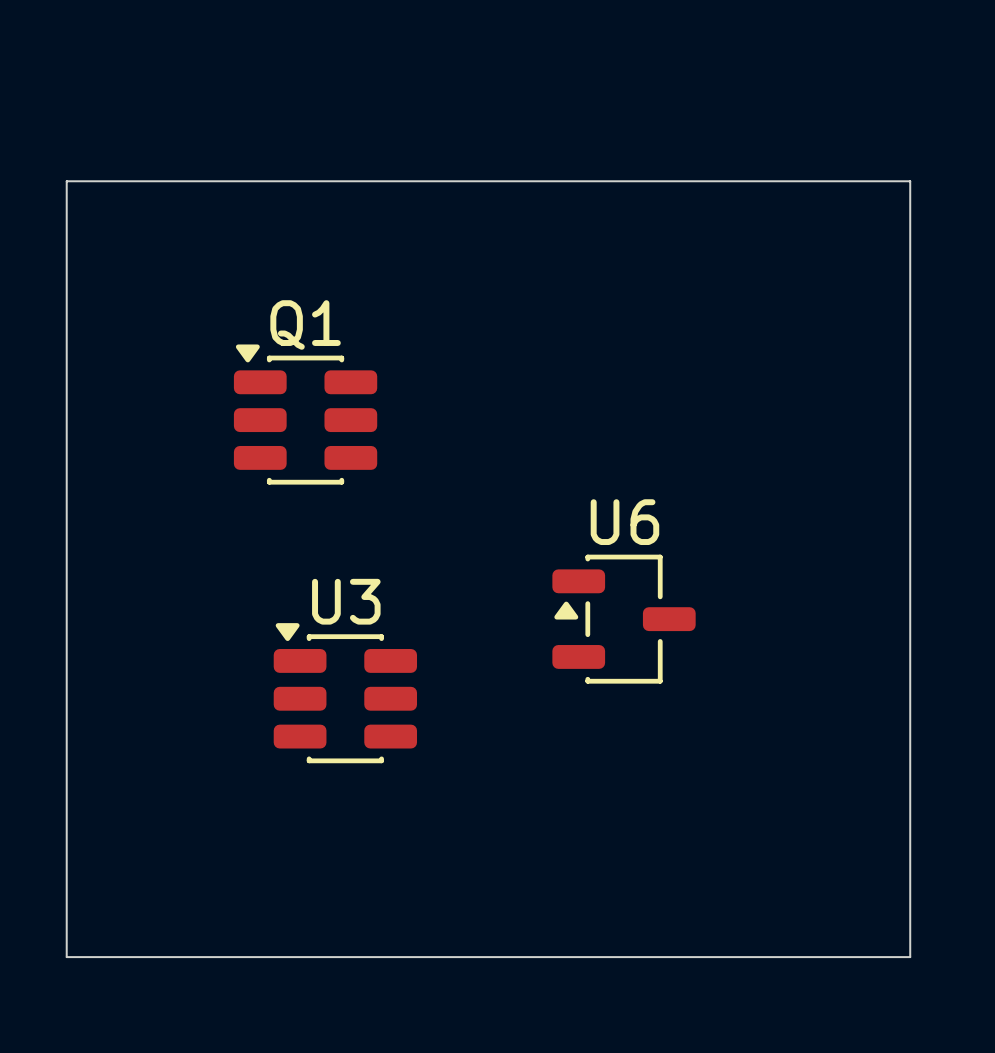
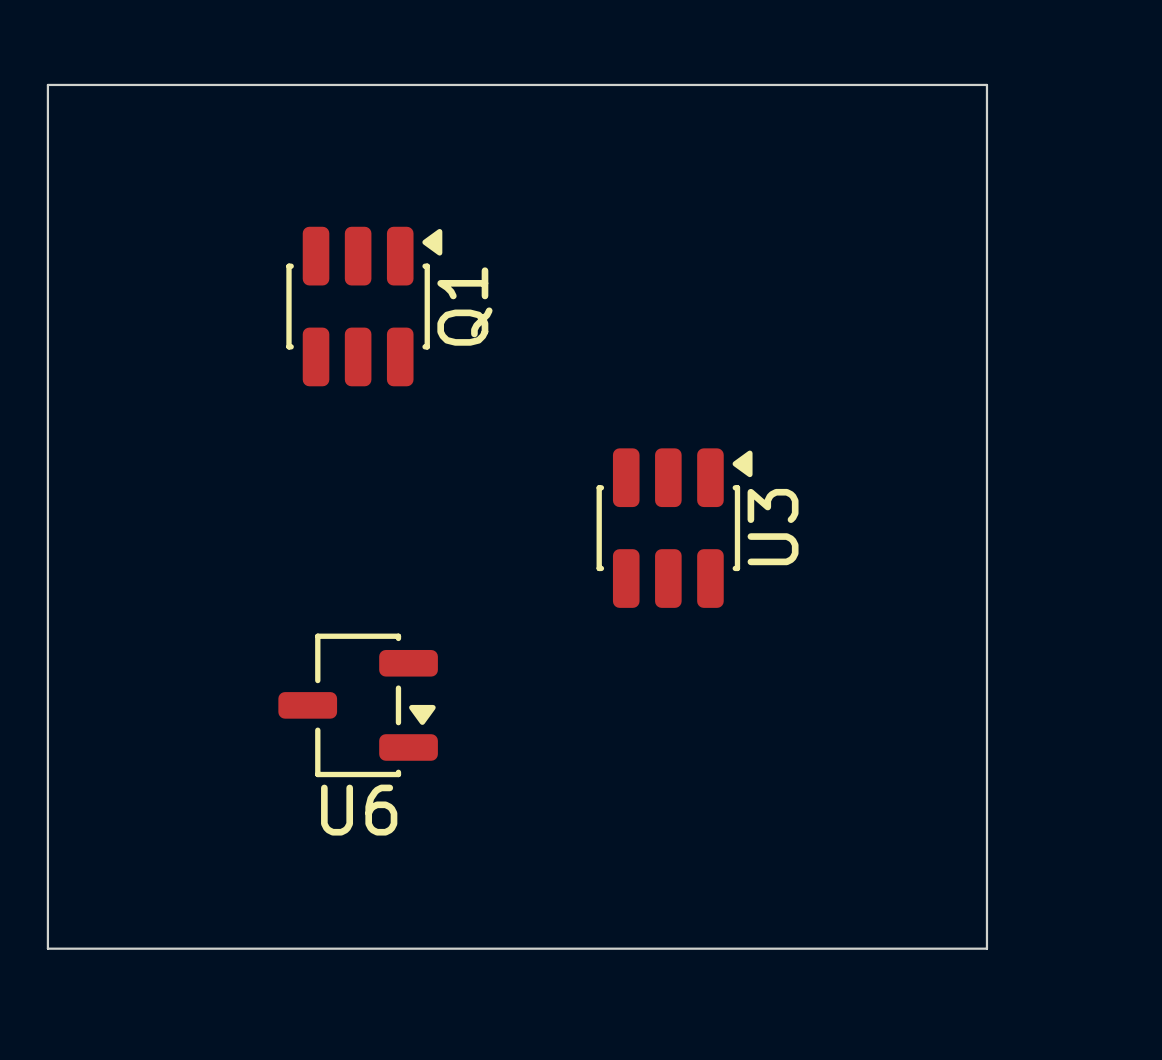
Q1 rotation: 0° (305, 414) -> 90° clockwise (364, 306)
U6 rotation: 0° (624, 619) -> 180° (358, 705)
U6 position: (624, 619) -> (358, 705)
U3 rotation: 0° (345, 693) -> 90° clockwise (674, 528)
U3 position: (345, 693) -> (674, 528)

